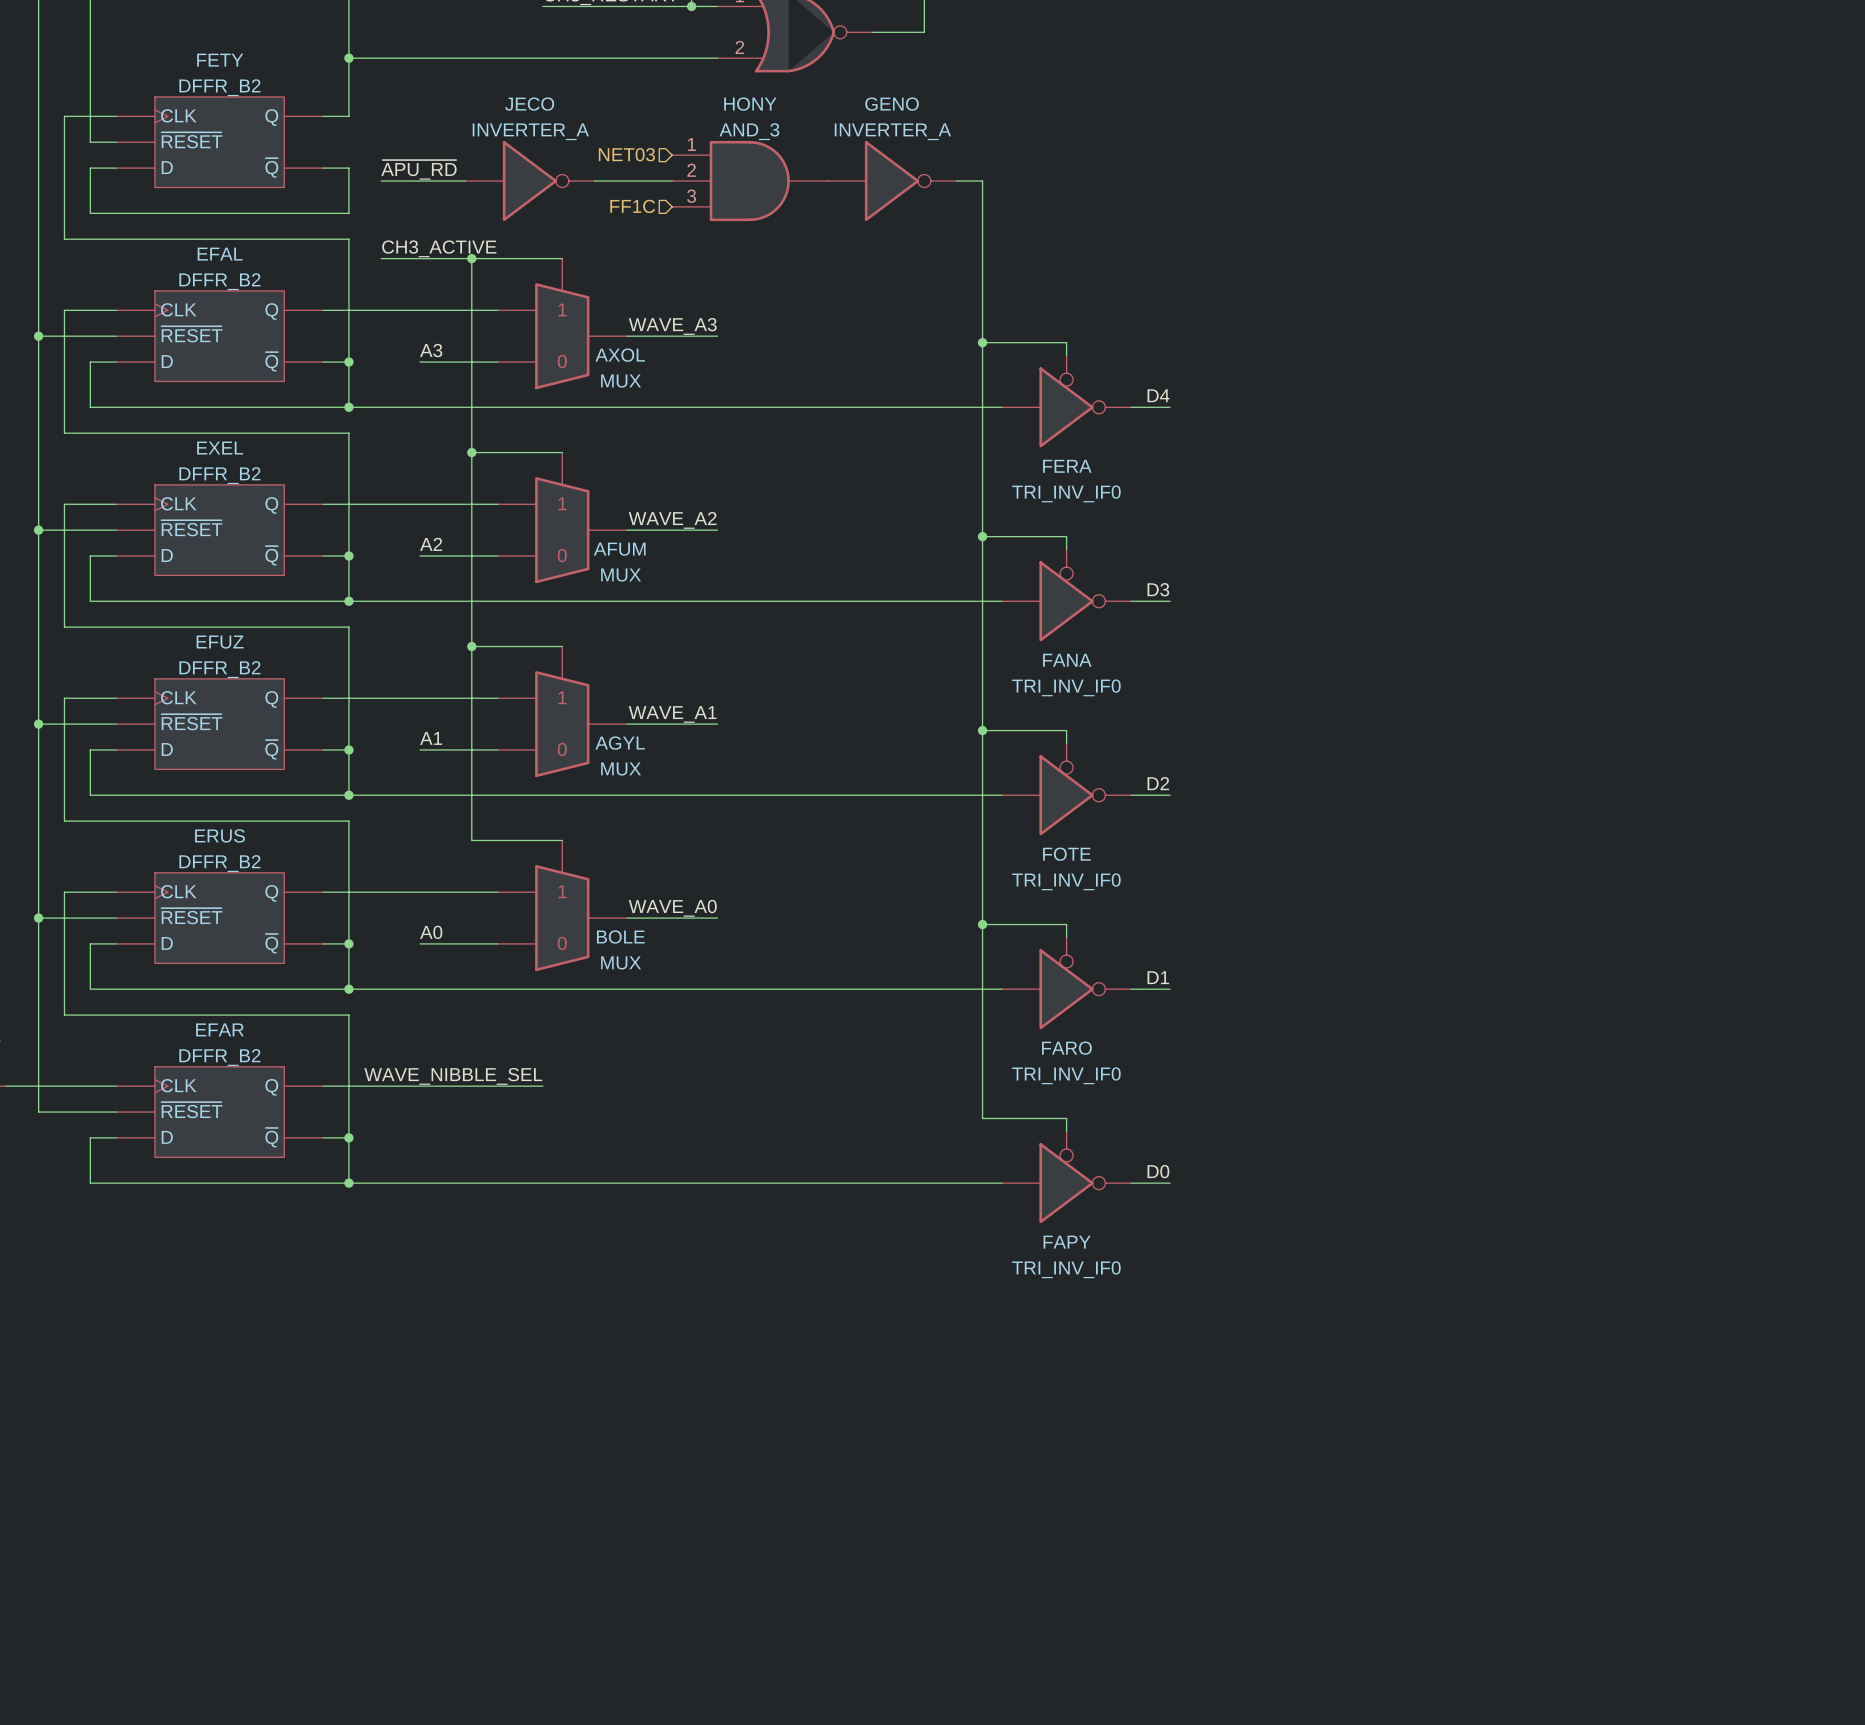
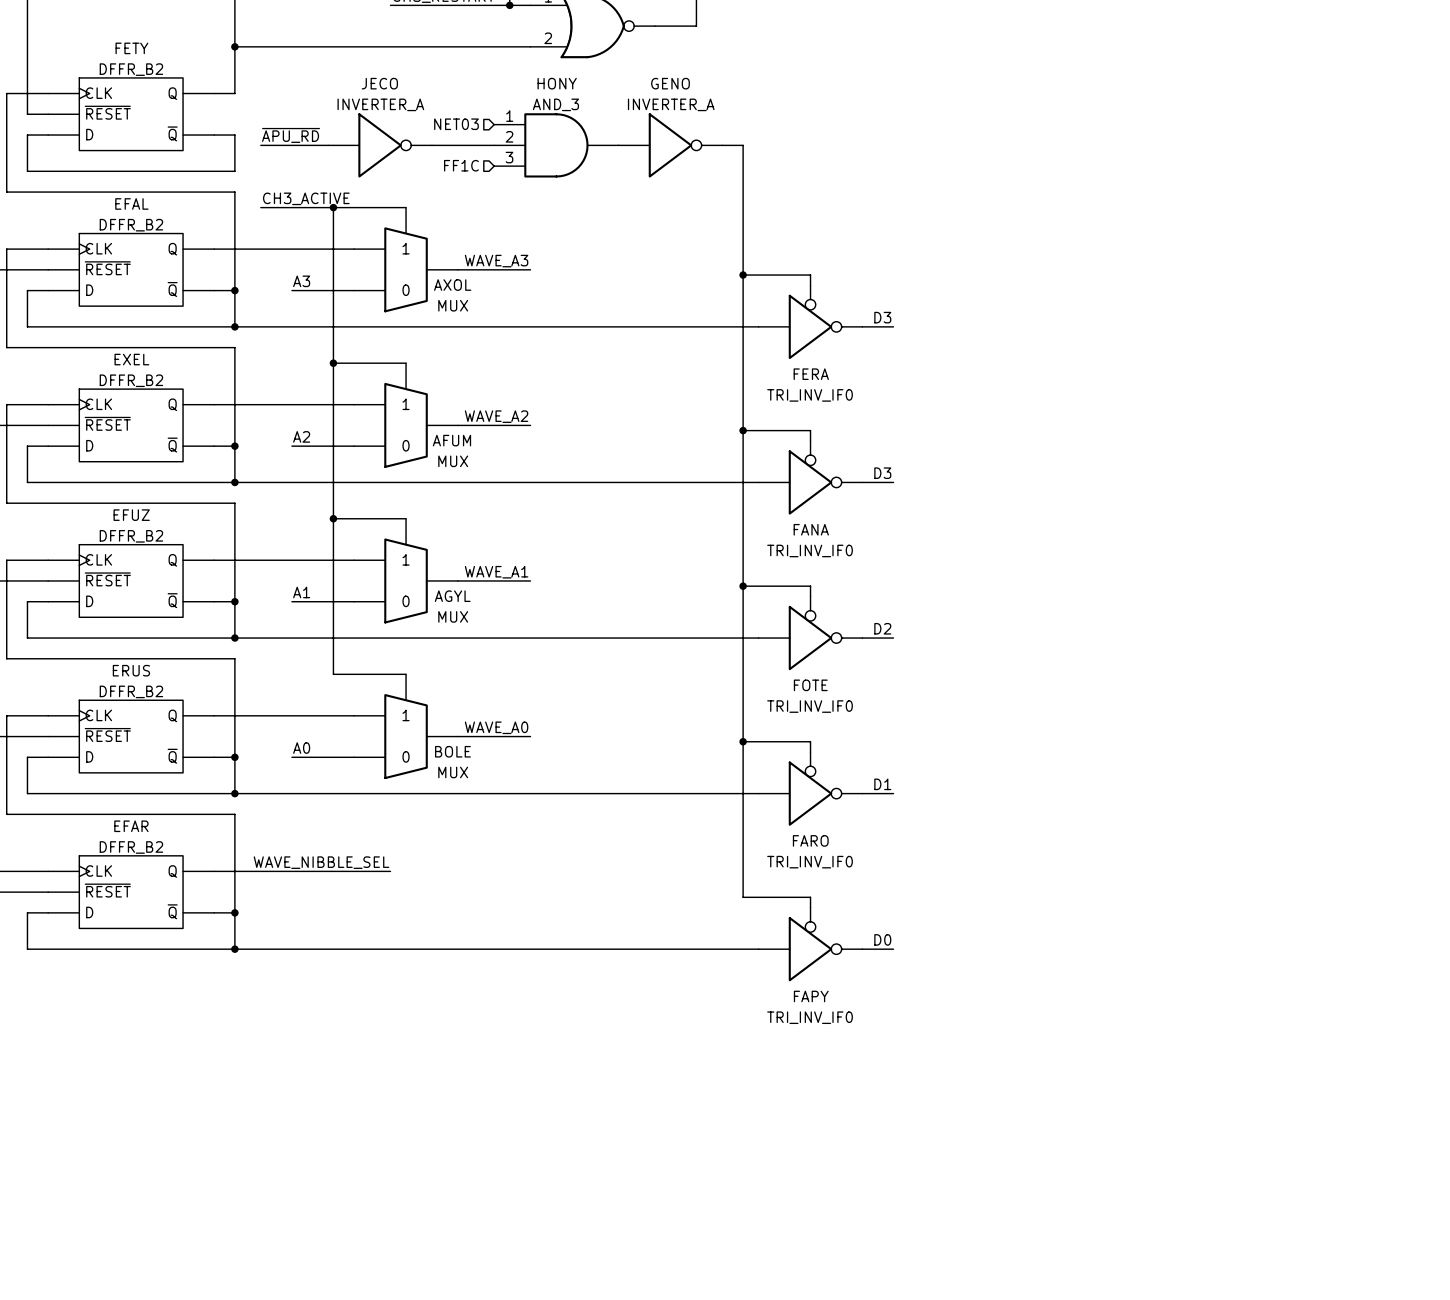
label: D4 (1158, 395) -> D3 (882, 317)

